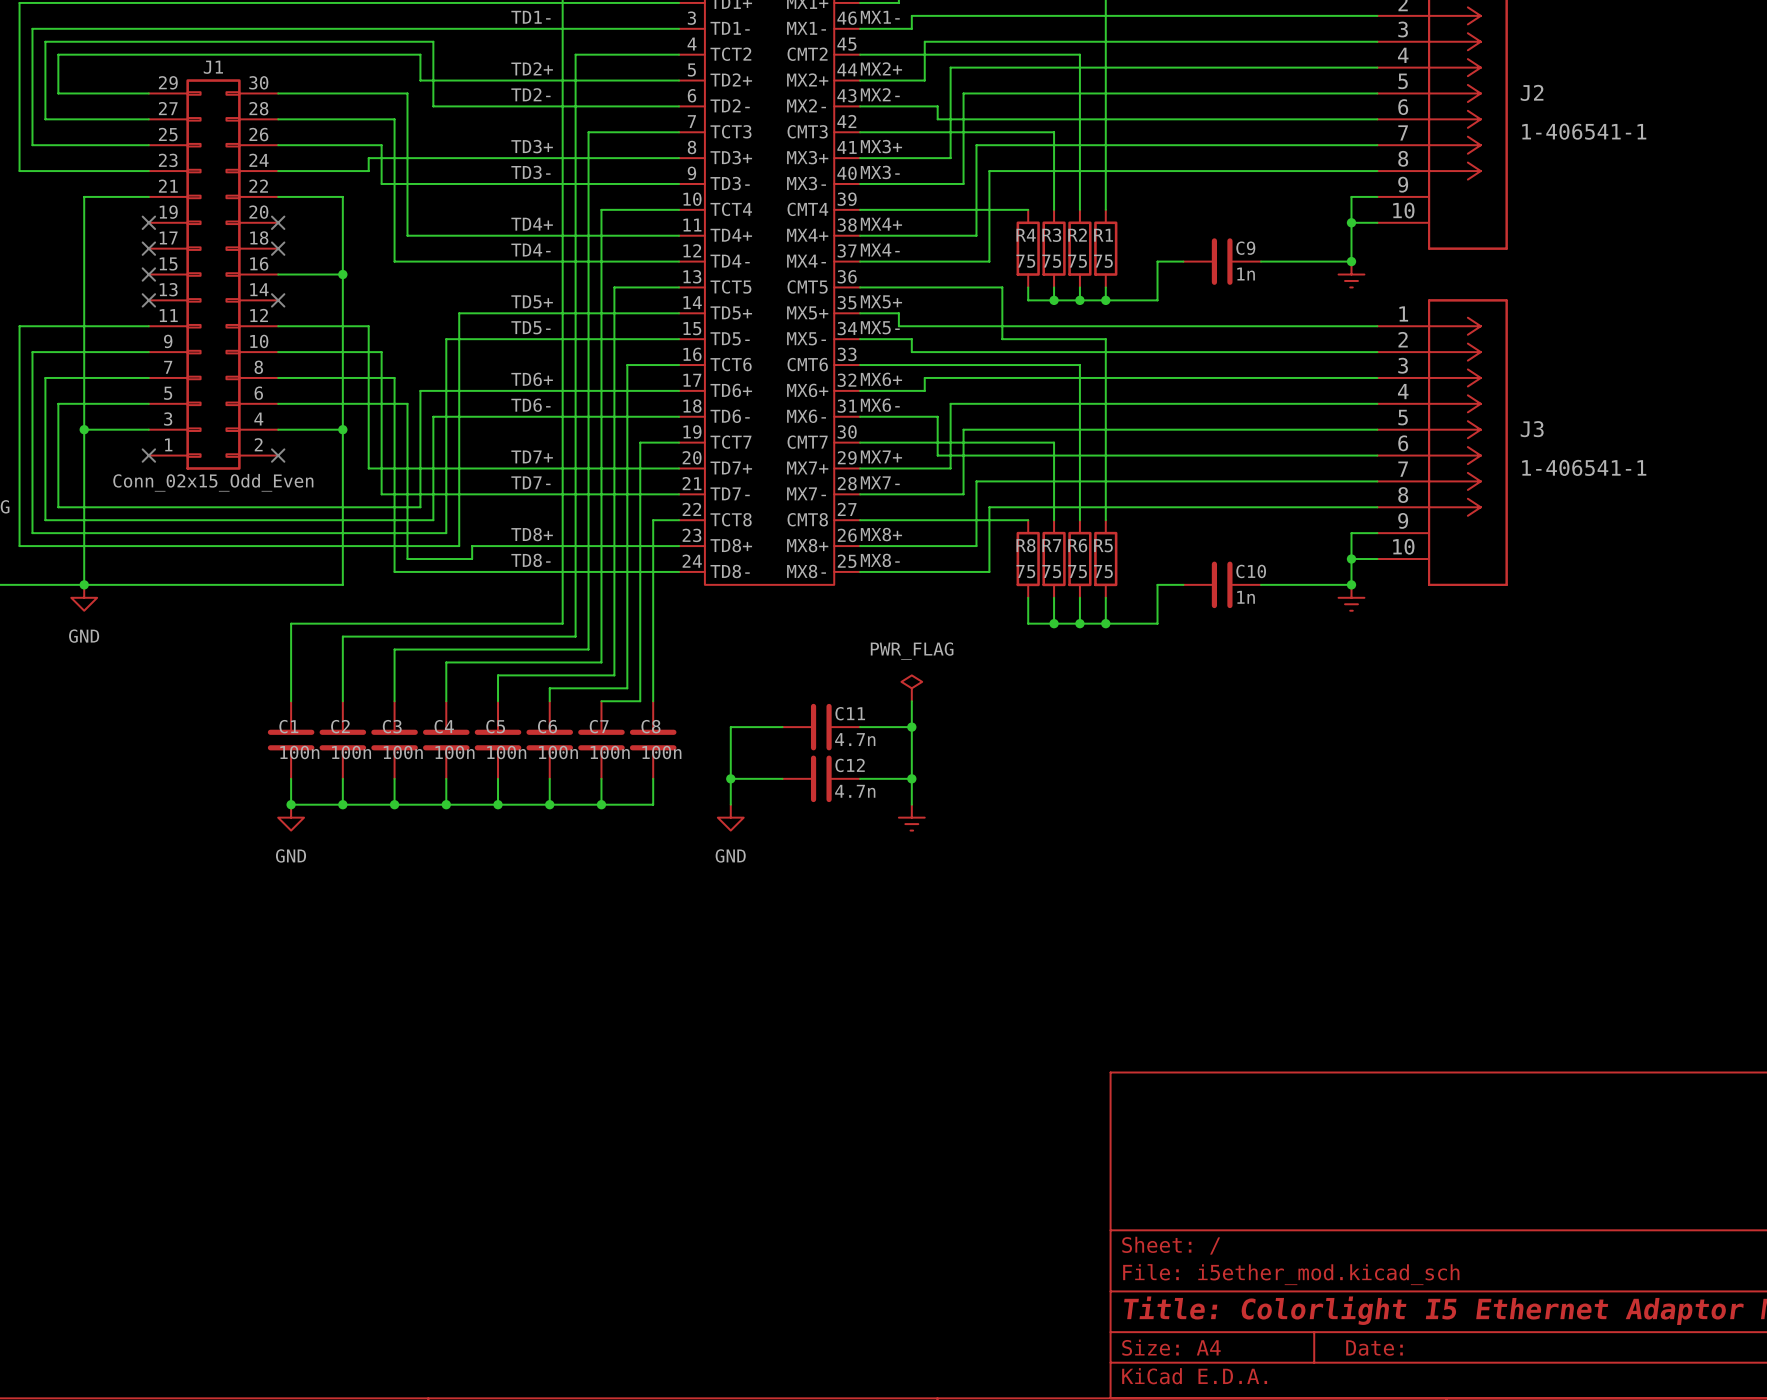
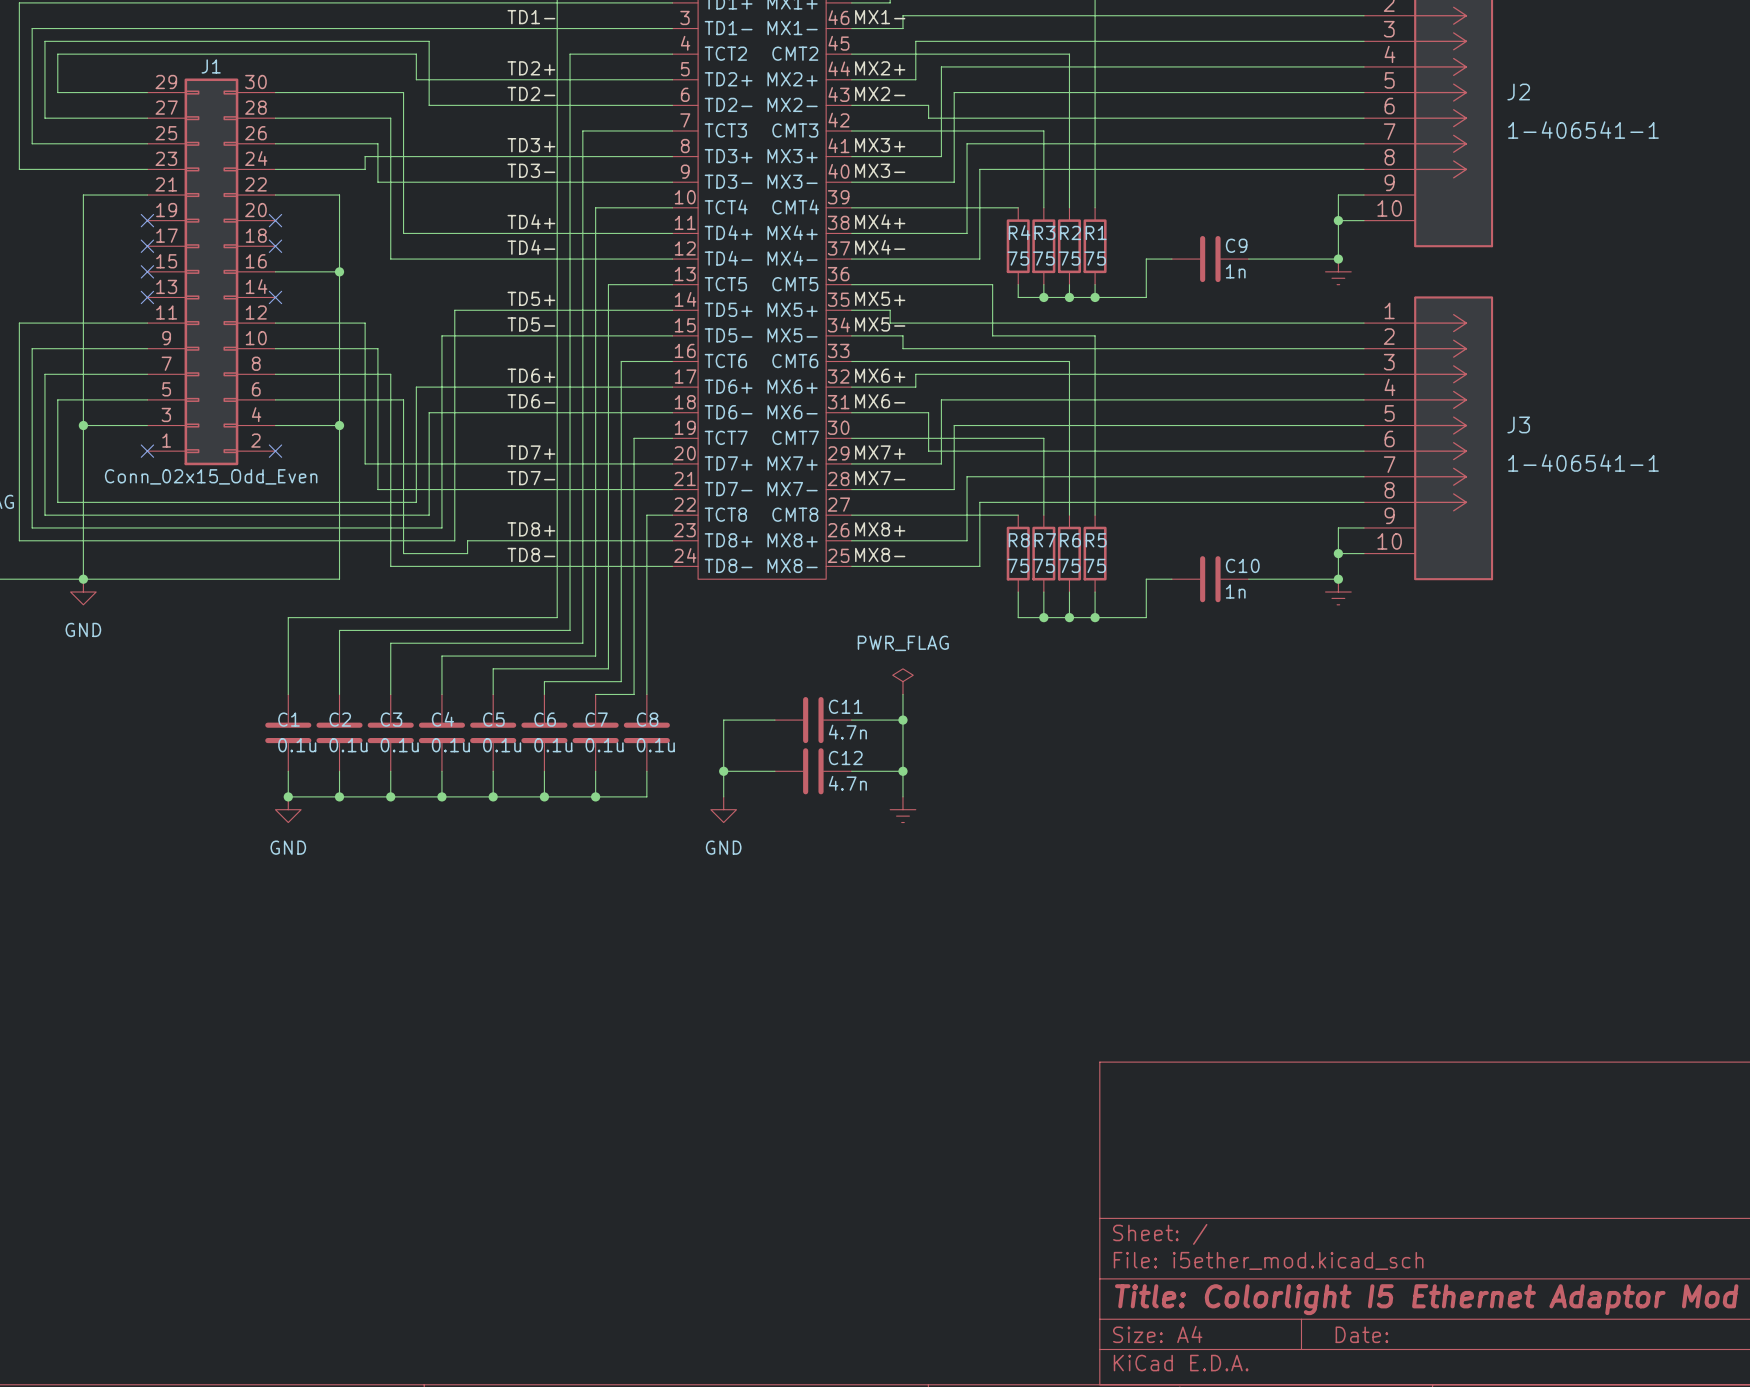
C1 value: 100n (299, 752) -> 0.1u (297, 745)
C2 value: 100n (351, 752) -> 0.1u (348, 745)
C3 value: 100n (403, 752) -> 0.1u (399, 745)
C4 value: 100n (454, 752) -> 0.1u (450, 745)
C5 value: 100n (506, 752) -> 0.1u (502, 745)
C6 value: 100n (558, 752) -> 0.1u (553, 745)
C7 value: 100n (610, 752) -> 0.1u (604, 745)
C8 value: 100n (661, 752) -> 0.1u (655, 745)

